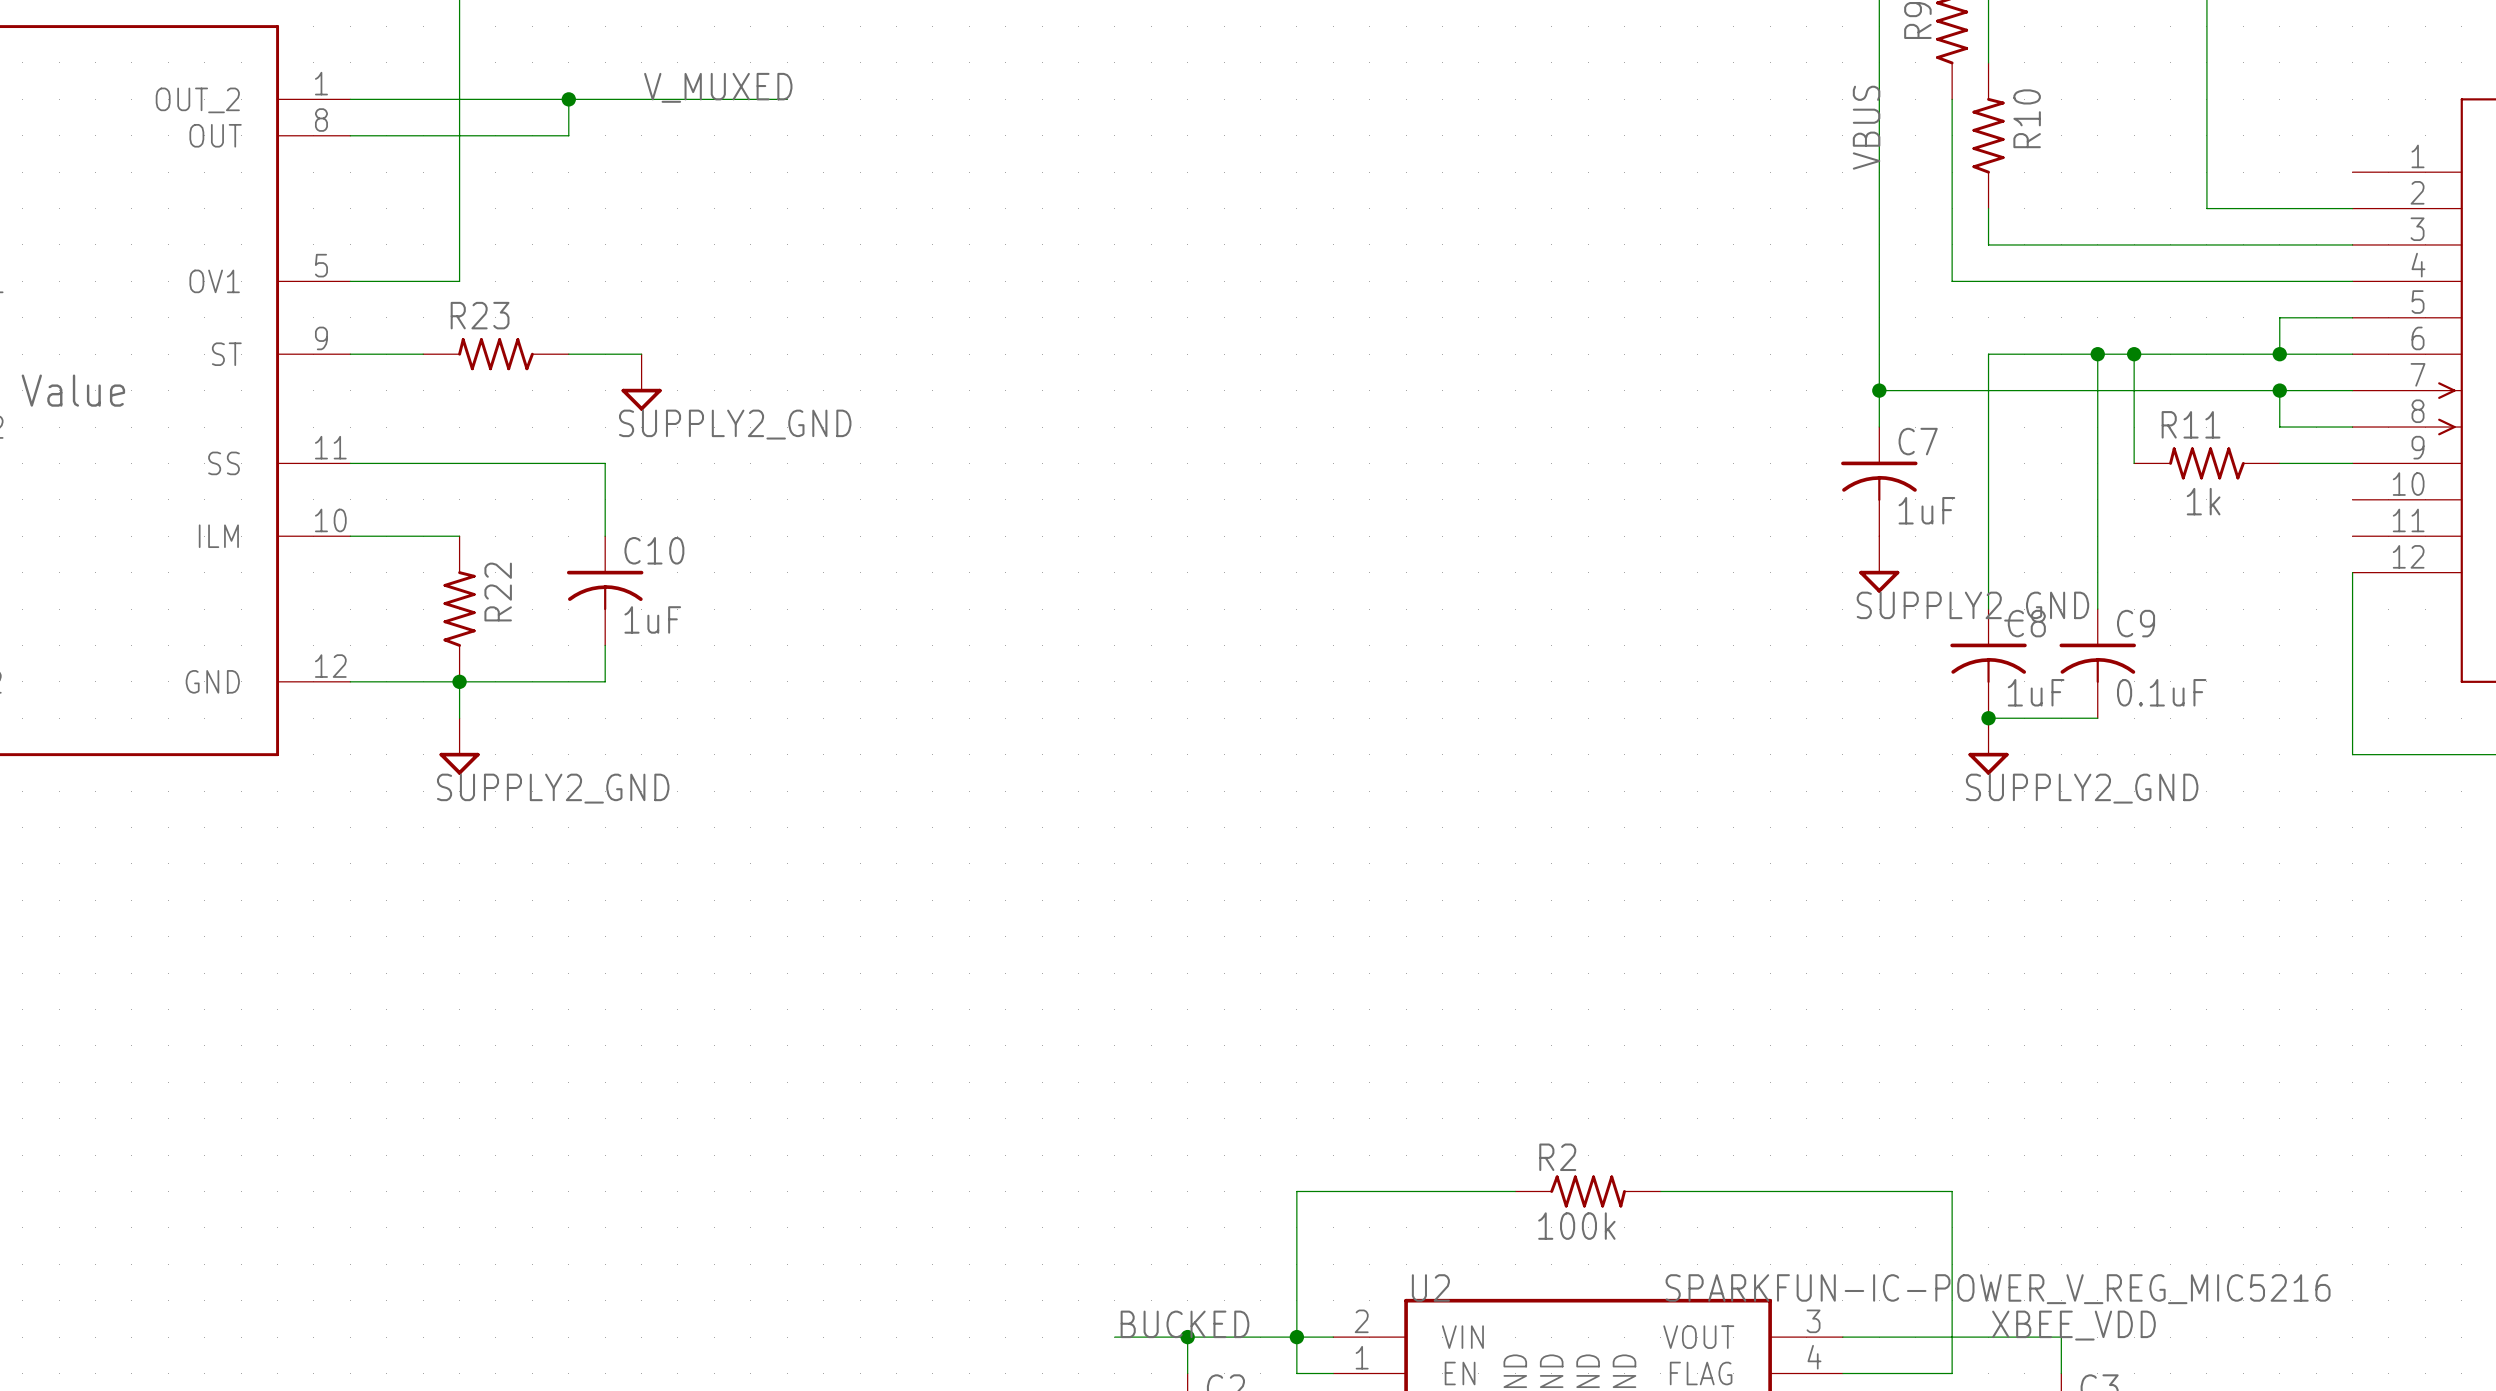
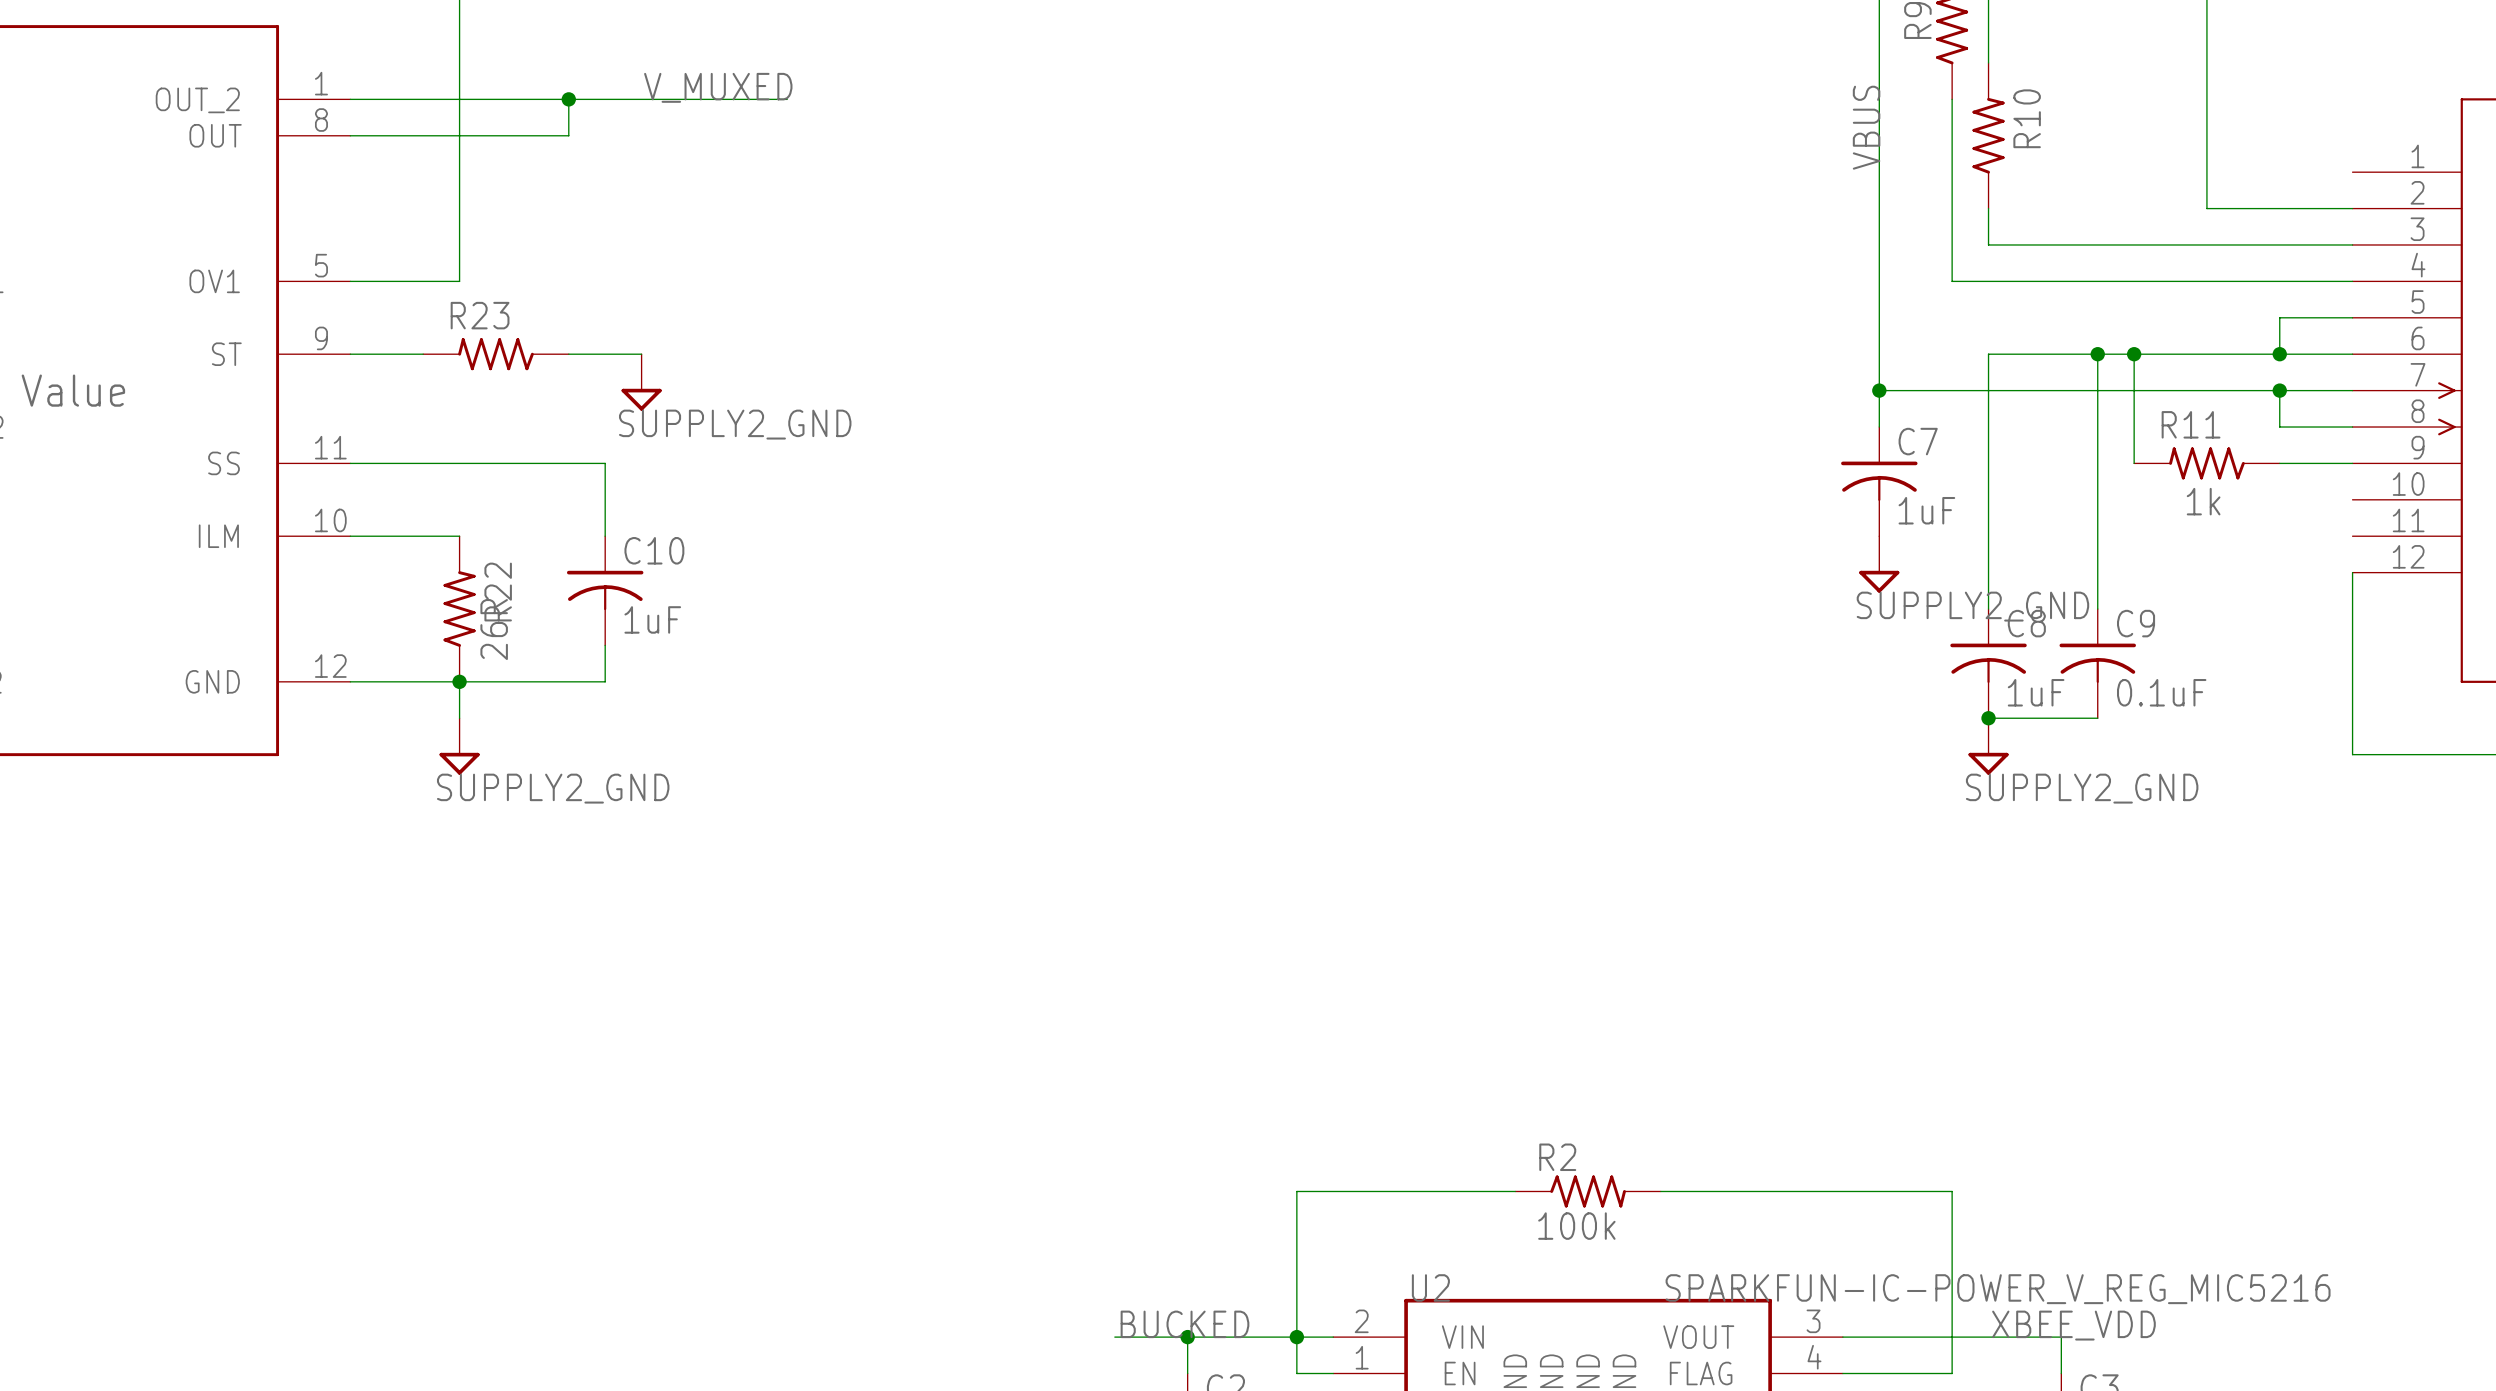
R22 value: none -> 26R (494, 629)

